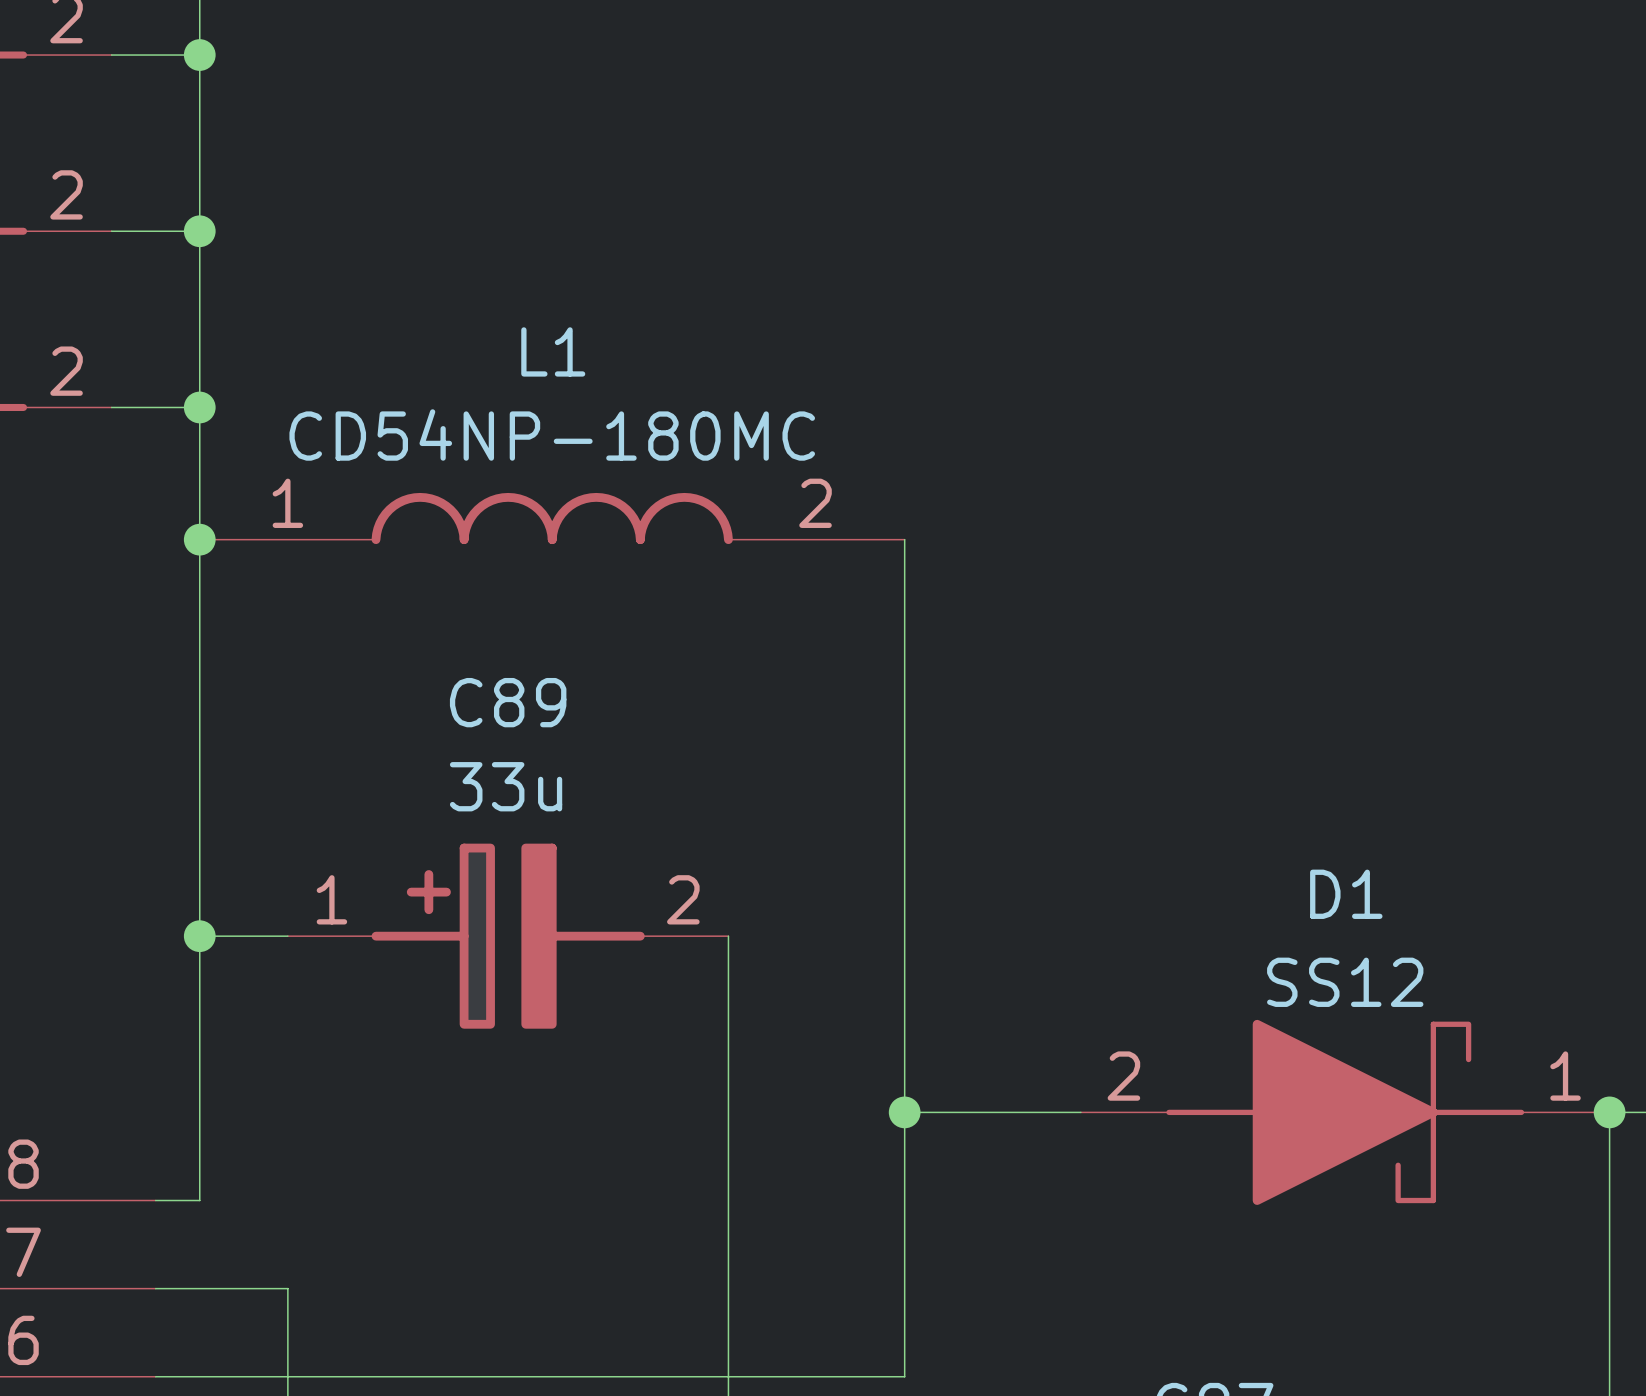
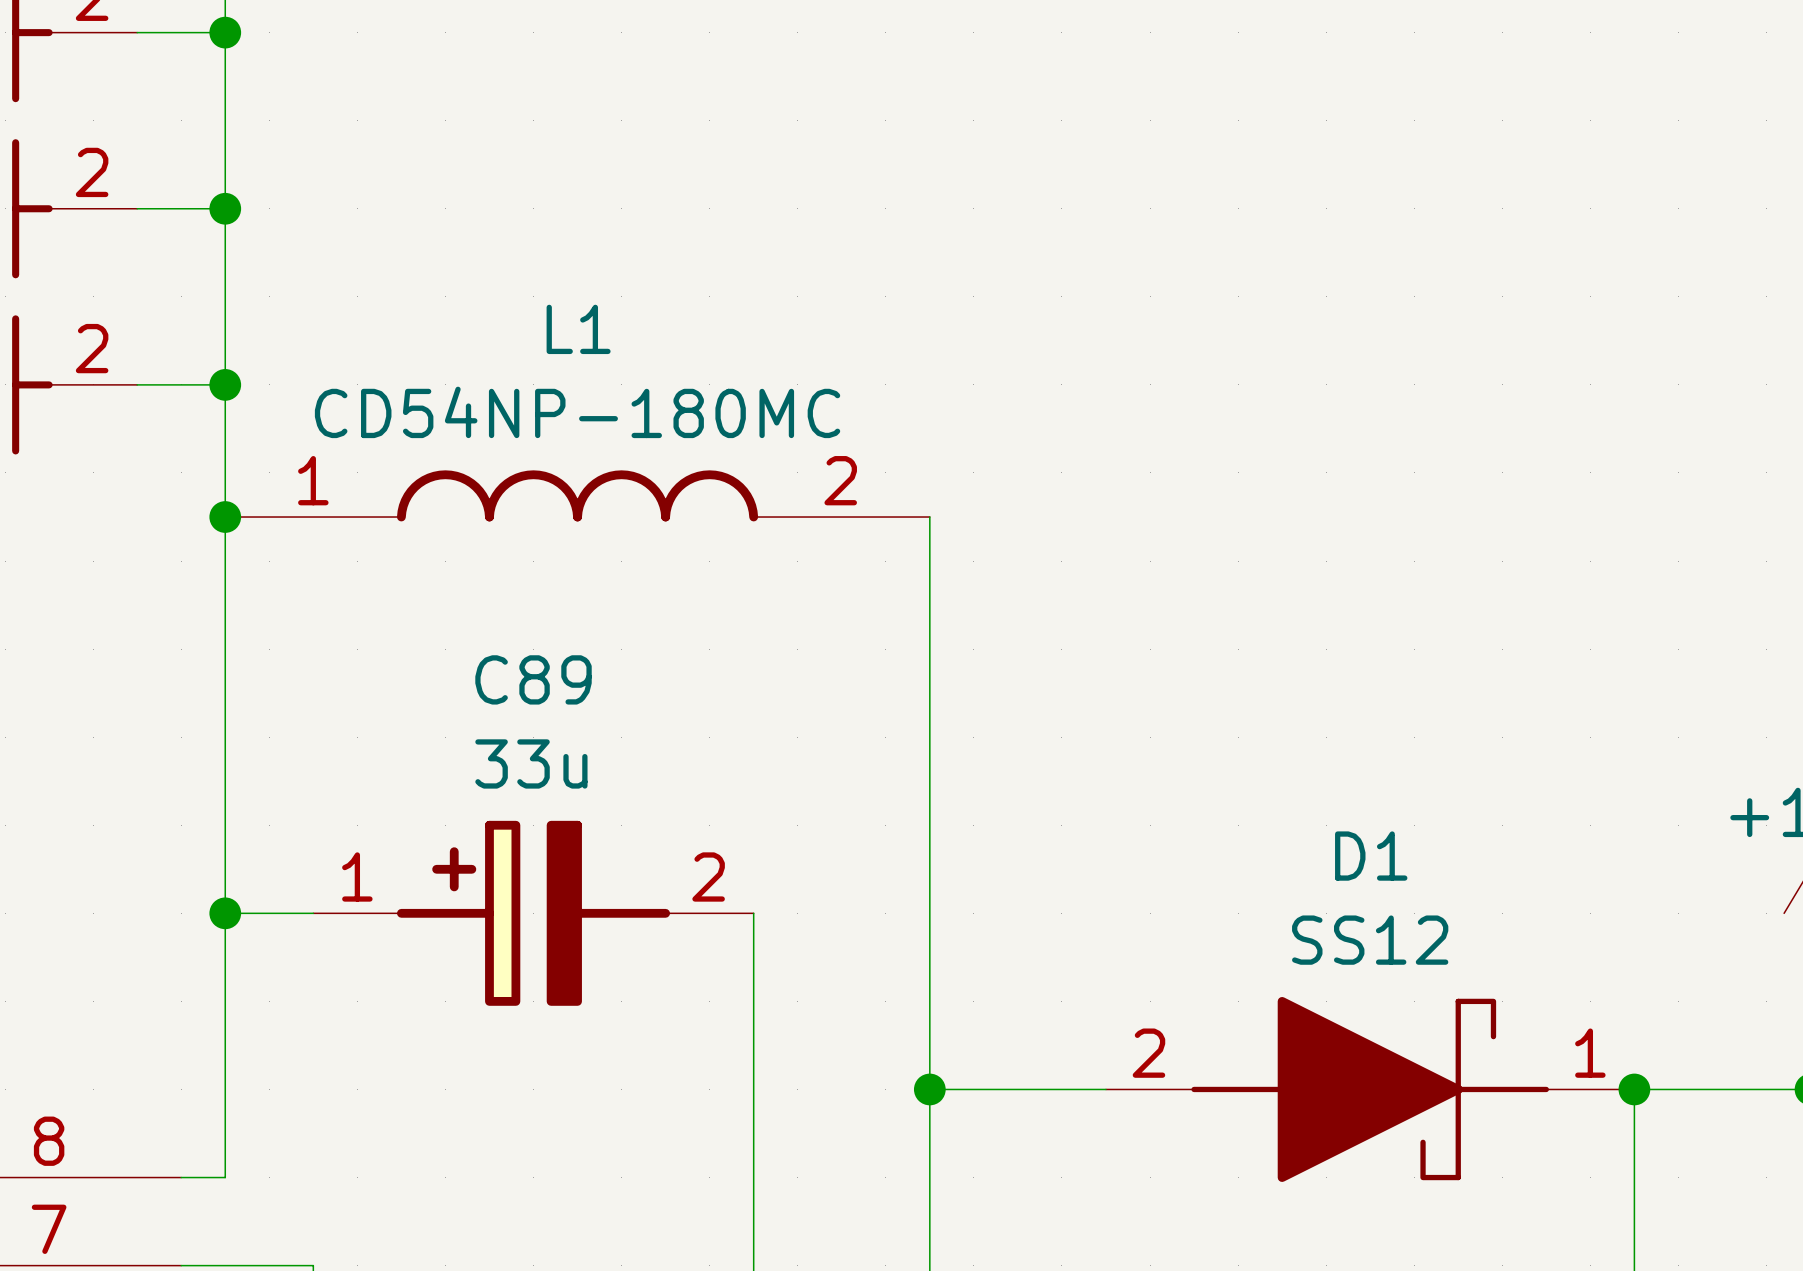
D1 name position: D1 (1346, 894) -> D1 (1371, 856)
D1 value position: SS12 (1345, 982) -> SS12 (1370, 940)

